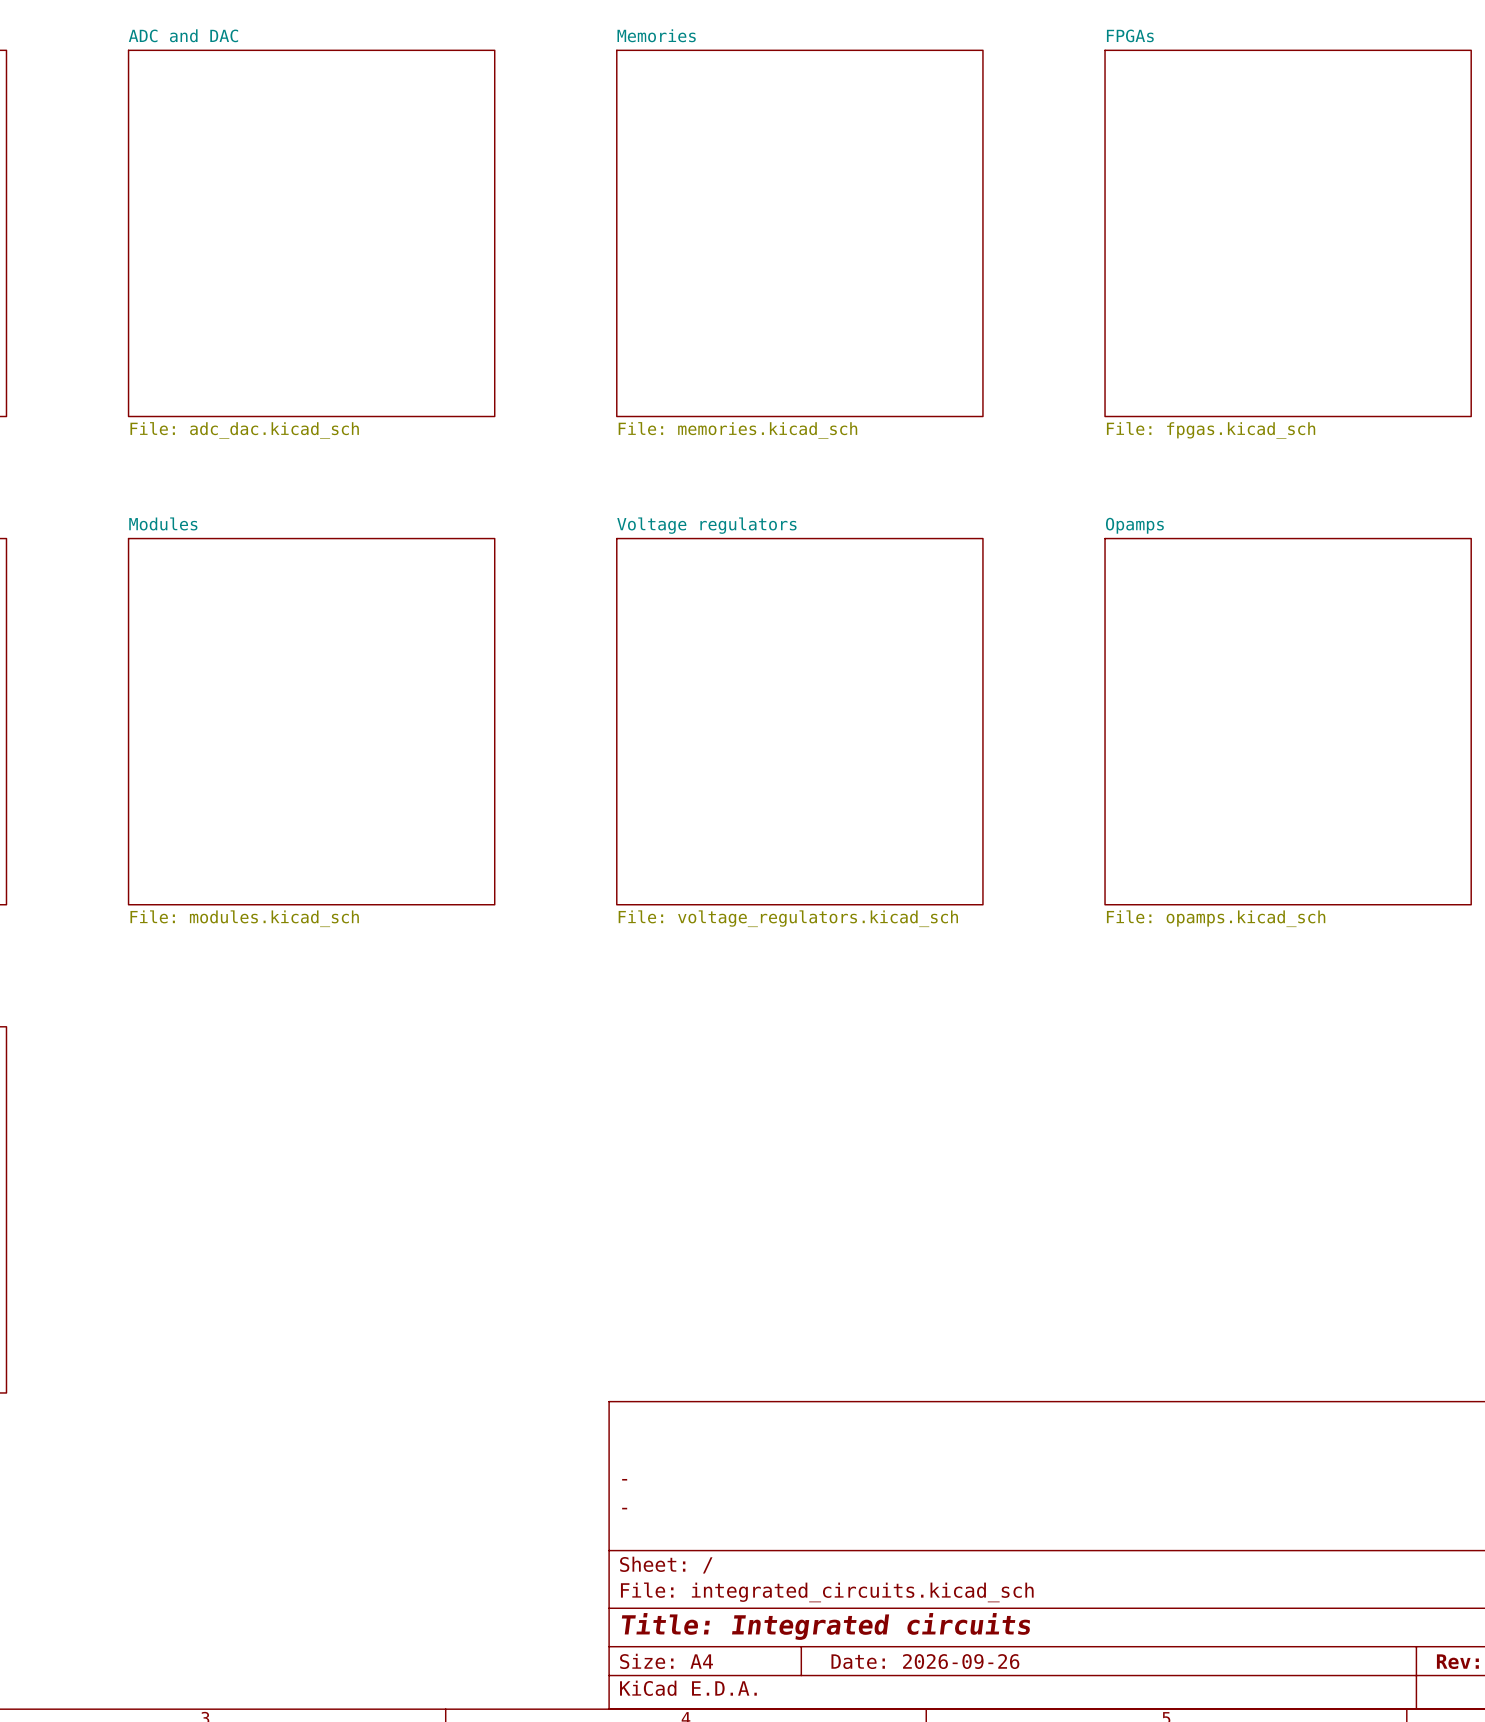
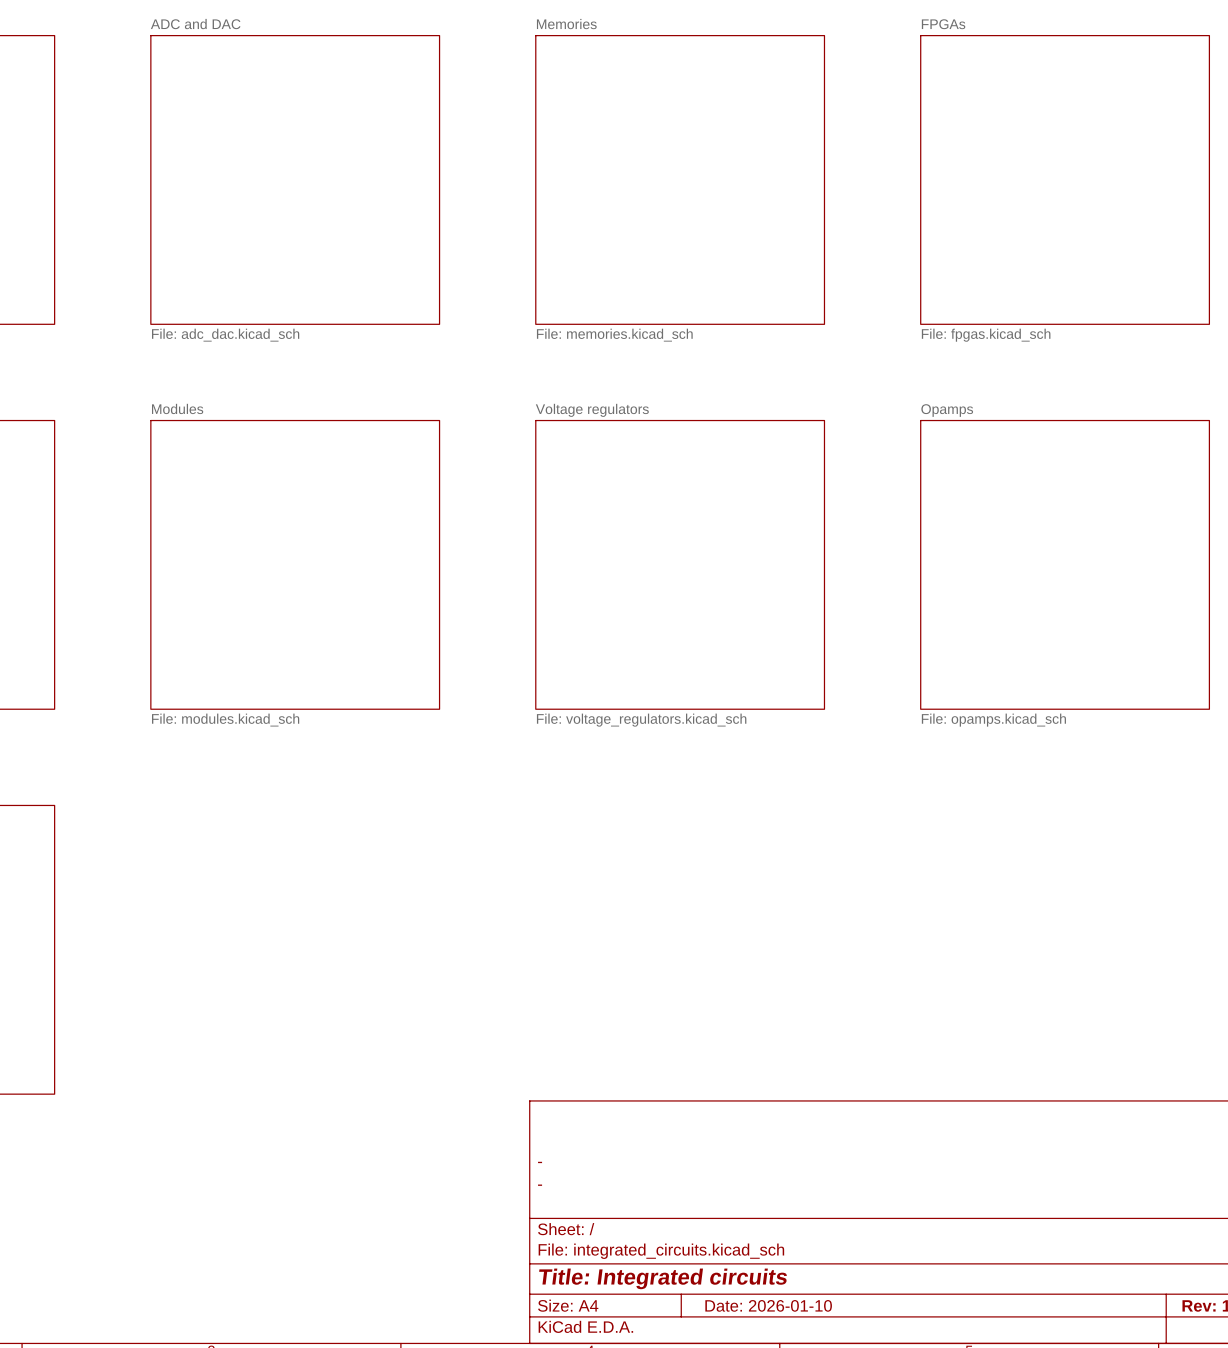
title block: Date: 2026-09-26 (925, 1661) -> Date: 2026-01-10 (768, 1305)

